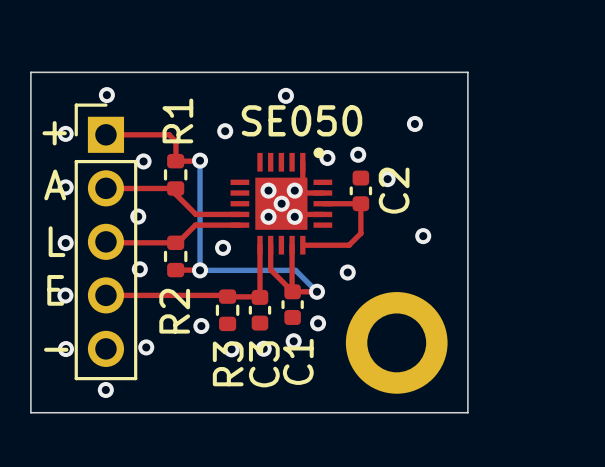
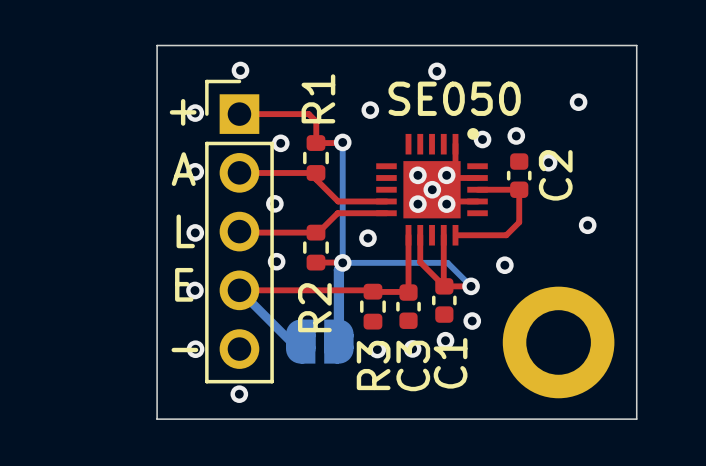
bottom track: none -> (342, 262) (342, 266) (338, 269) (338, 341)
bottom track: none -> (239, 290) (290, 341) (300, 341)
via: (201, 326) -> none
part: none -> (319, 341)
via: (146, 347) -> none

